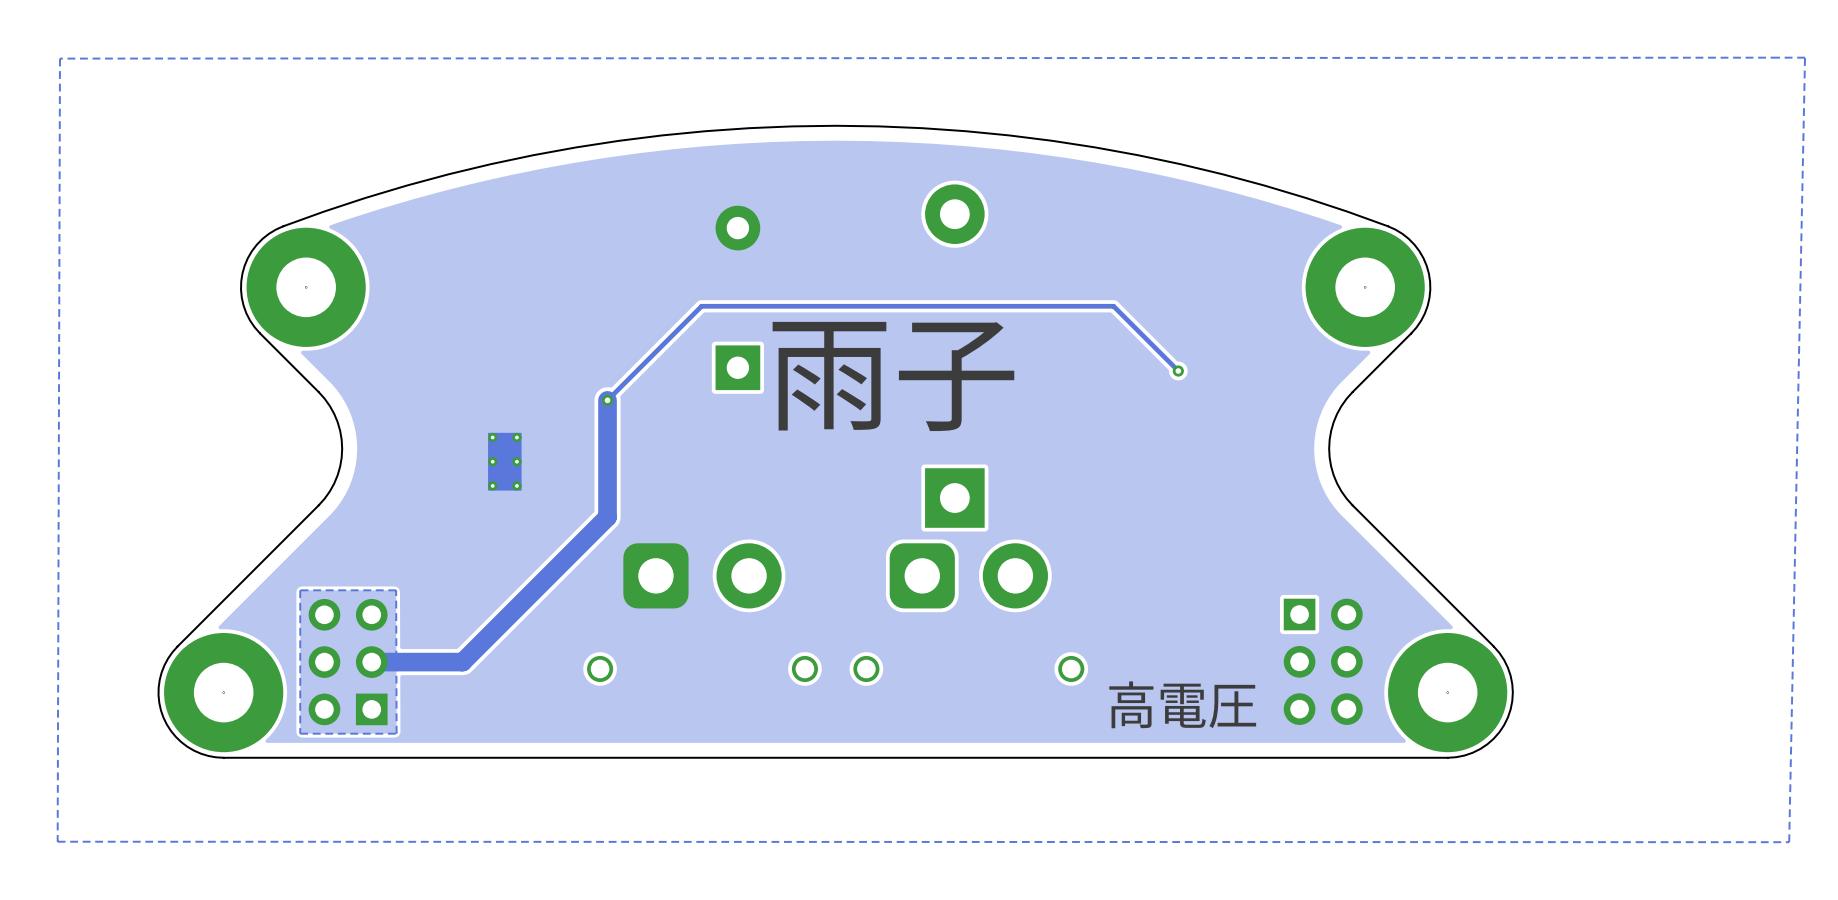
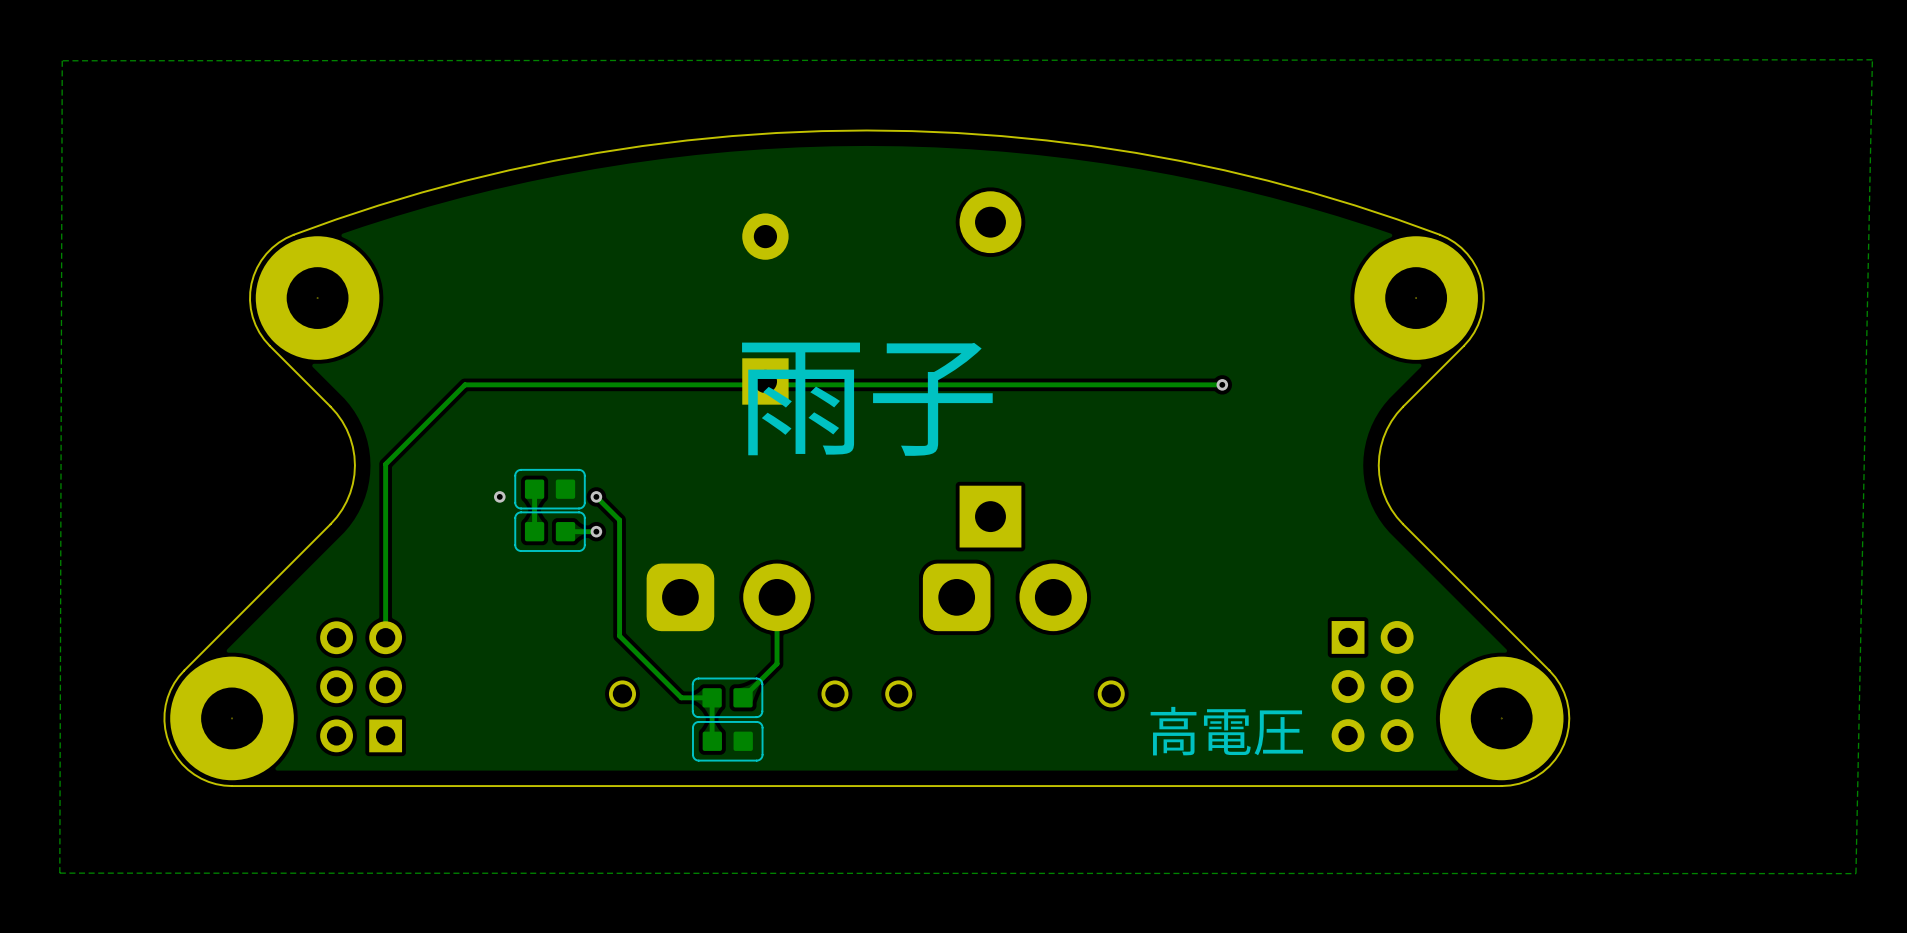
track: (1178, 371) (1113, 306) (701, 306) (607, 400) -> (1222, 384) (465, 384) (385, 464) (385, 637)
text position: 雨子 (893, 376) -> 雨子 (867, 399)
track: (607, 400) (607, 517) (462, 662) (371, 662) -> none
via: (607, 400) -> none
part: (504, 461) -> none
track: none -> (534, 489) (534, 531)
part: none -> (550, 489)
via: none -> (499, 496)
track: none -> (596, 496) (619, 520) (619, 636) (681, 697) (712, 697) (712, 741)
via: none -> (596, 496)
part: none -> (550, 531)
track: none -> (596, 531) (565, 531)
via: none -> (596, 531)
track: none -> (777, 597) (777, 663) (743, 697)
zone outline: (396, 590) (300, 590) (300, 733) (396, 733) (396, 590) -> none
part: none -> (727, 697)
part: none -> (727, 741)

